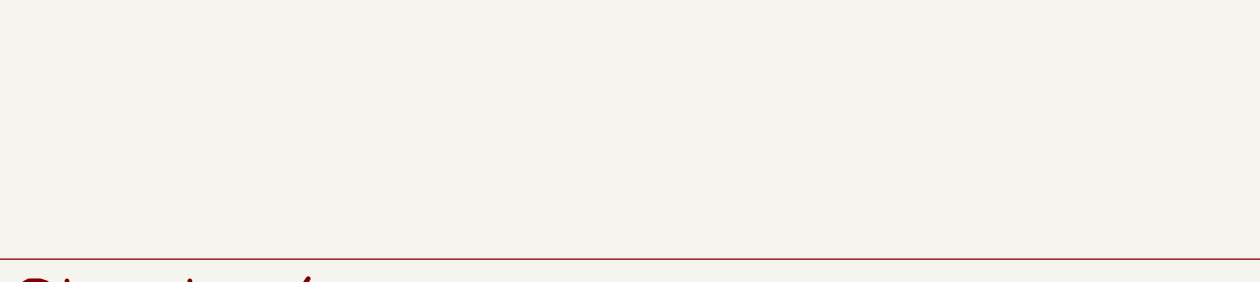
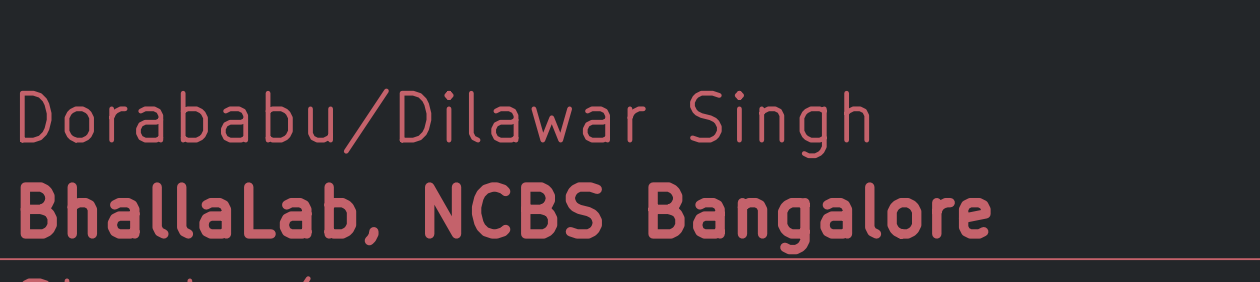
title block: none -> Dorababu/Dilawar Singh (444, 123)
title block: none -> BhallaLab, NCBS Bangalore (505, 218)

